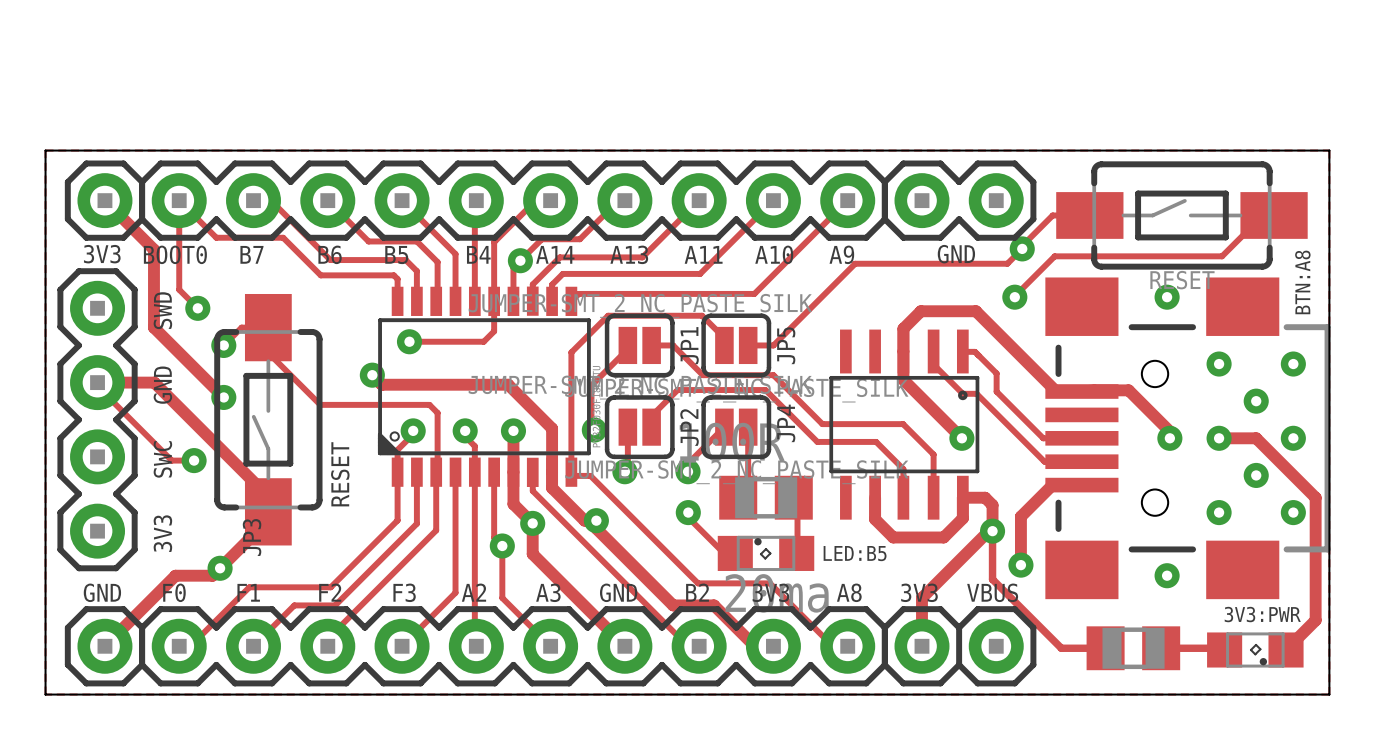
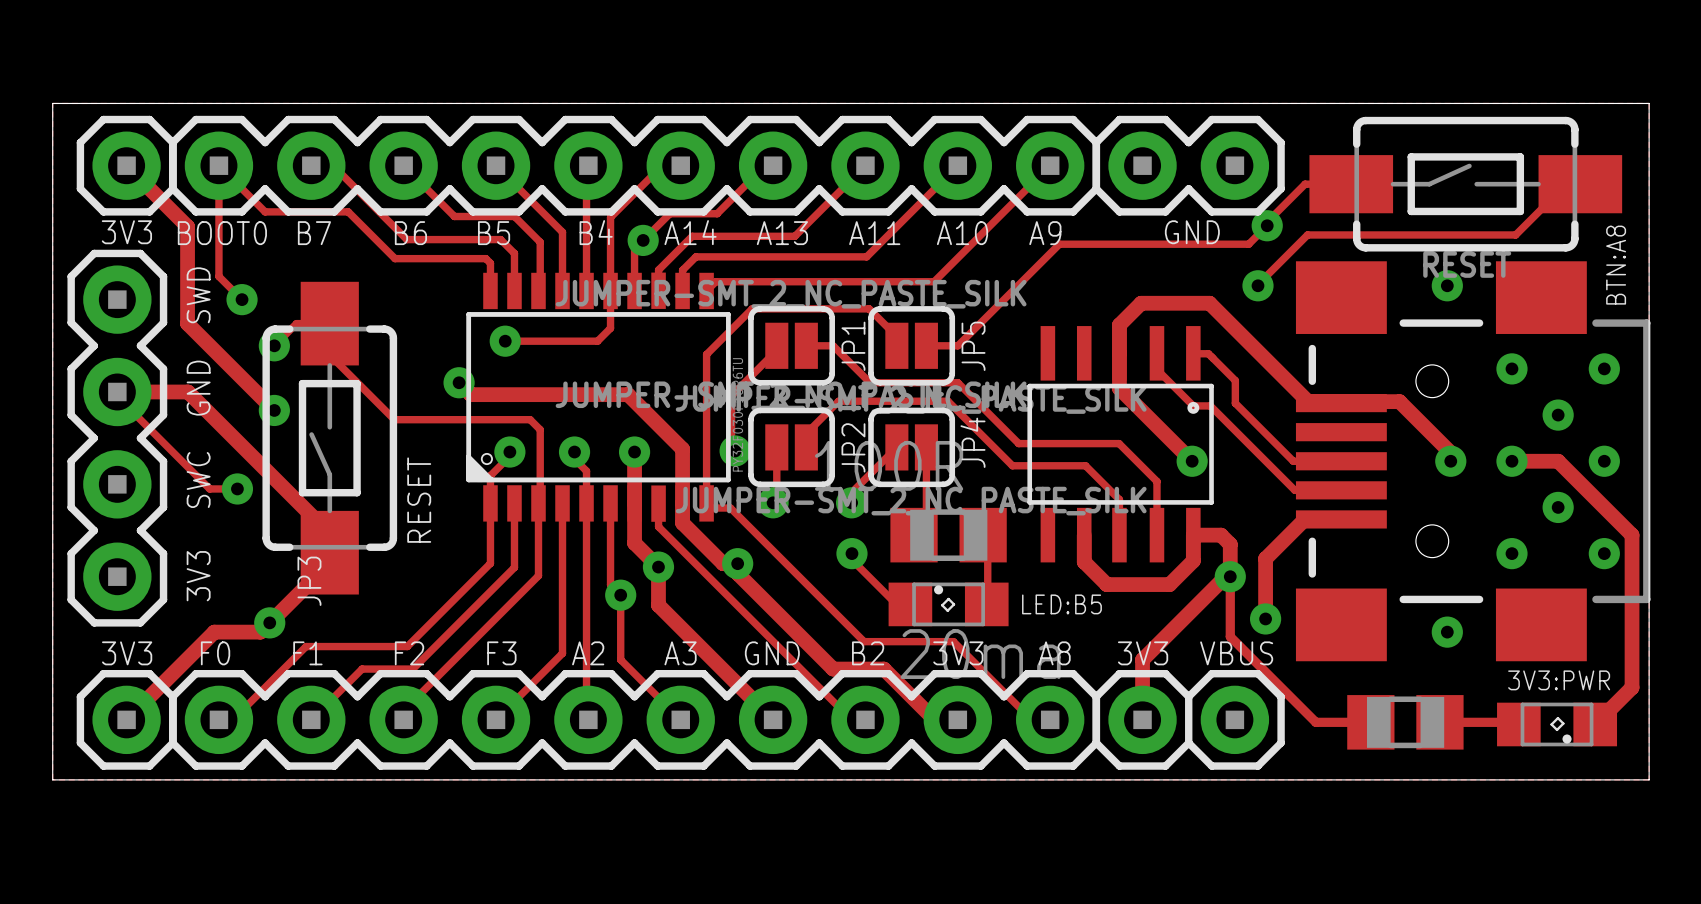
text: GND (102, 592) -> 3V3 (127, 653)

